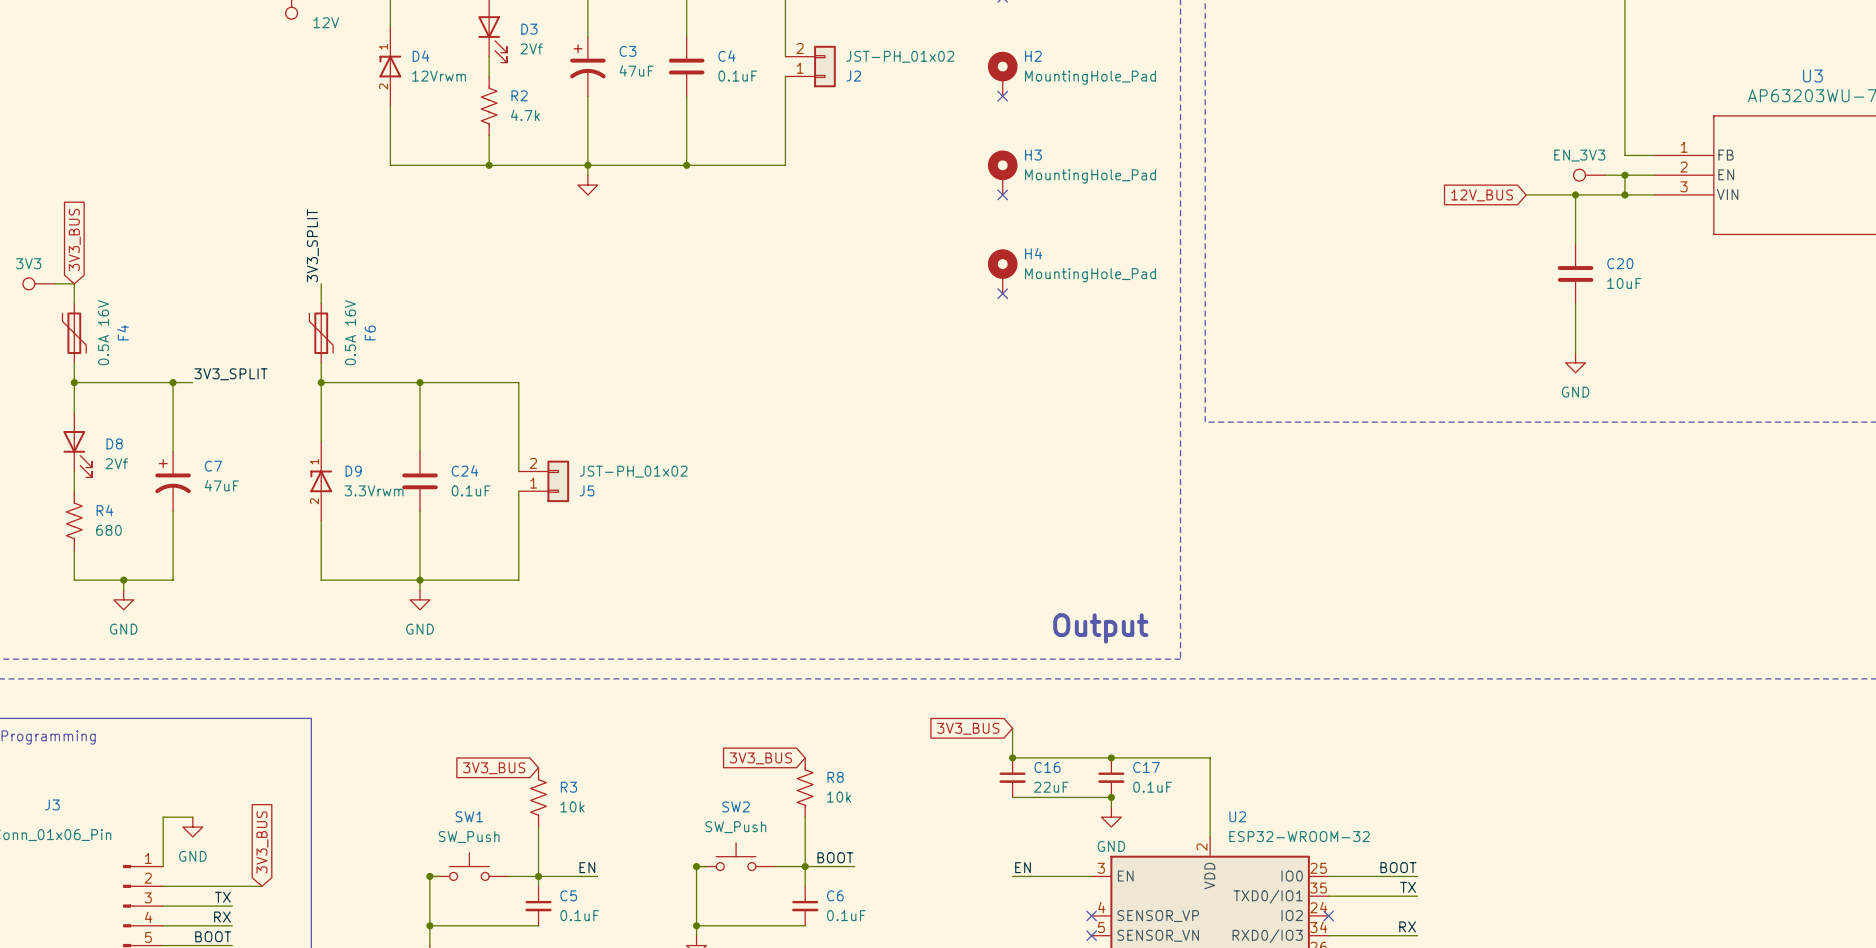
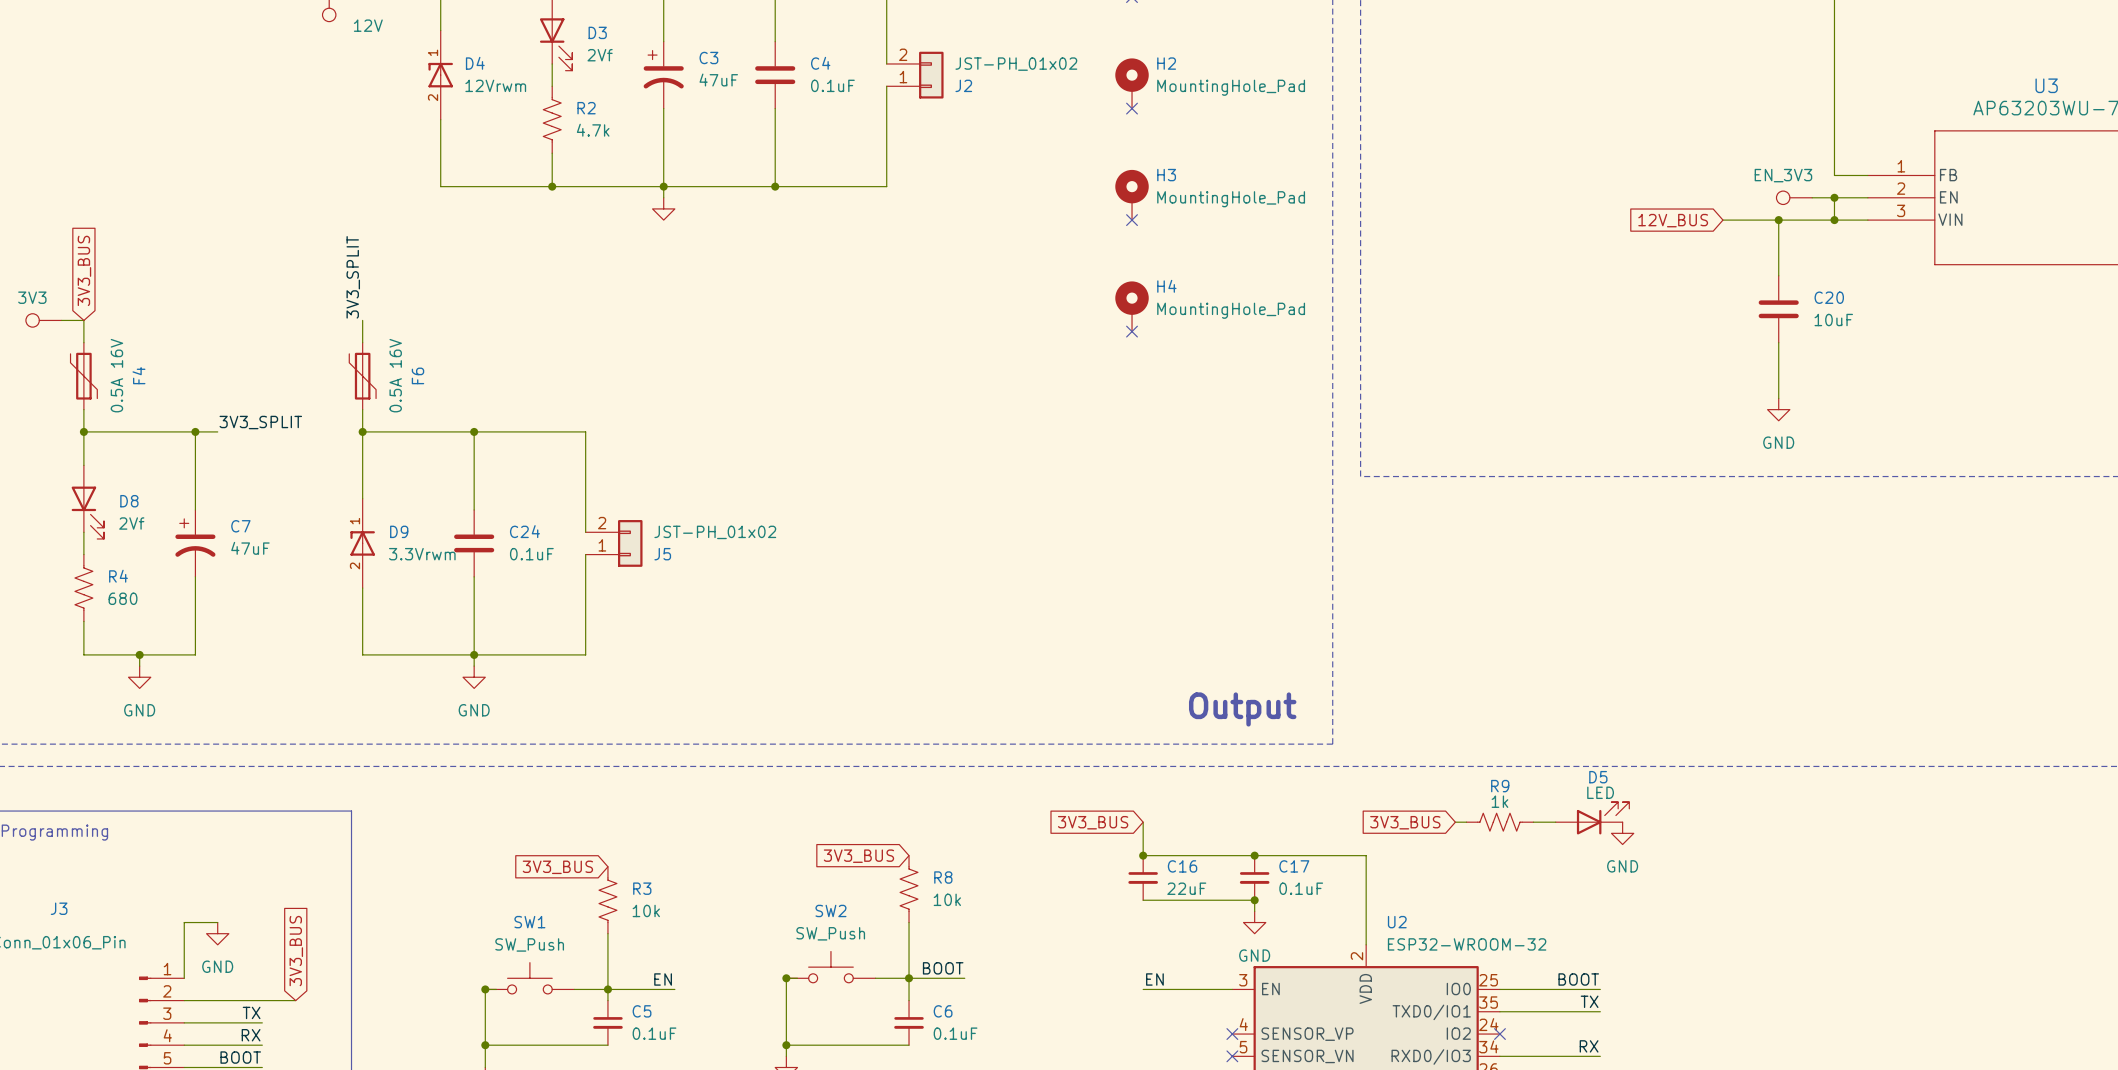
D5: none -> LED (1592, 818)
global label: none -> 3V3_BUS (1405, 822)
wire: none -> (1455, 822) (1466, 822)
R9: none -> 1k (1499, 822)
wire: none -> (1533, 822) (1555, 822)
power symbol: none -> GND (1622, 833)

